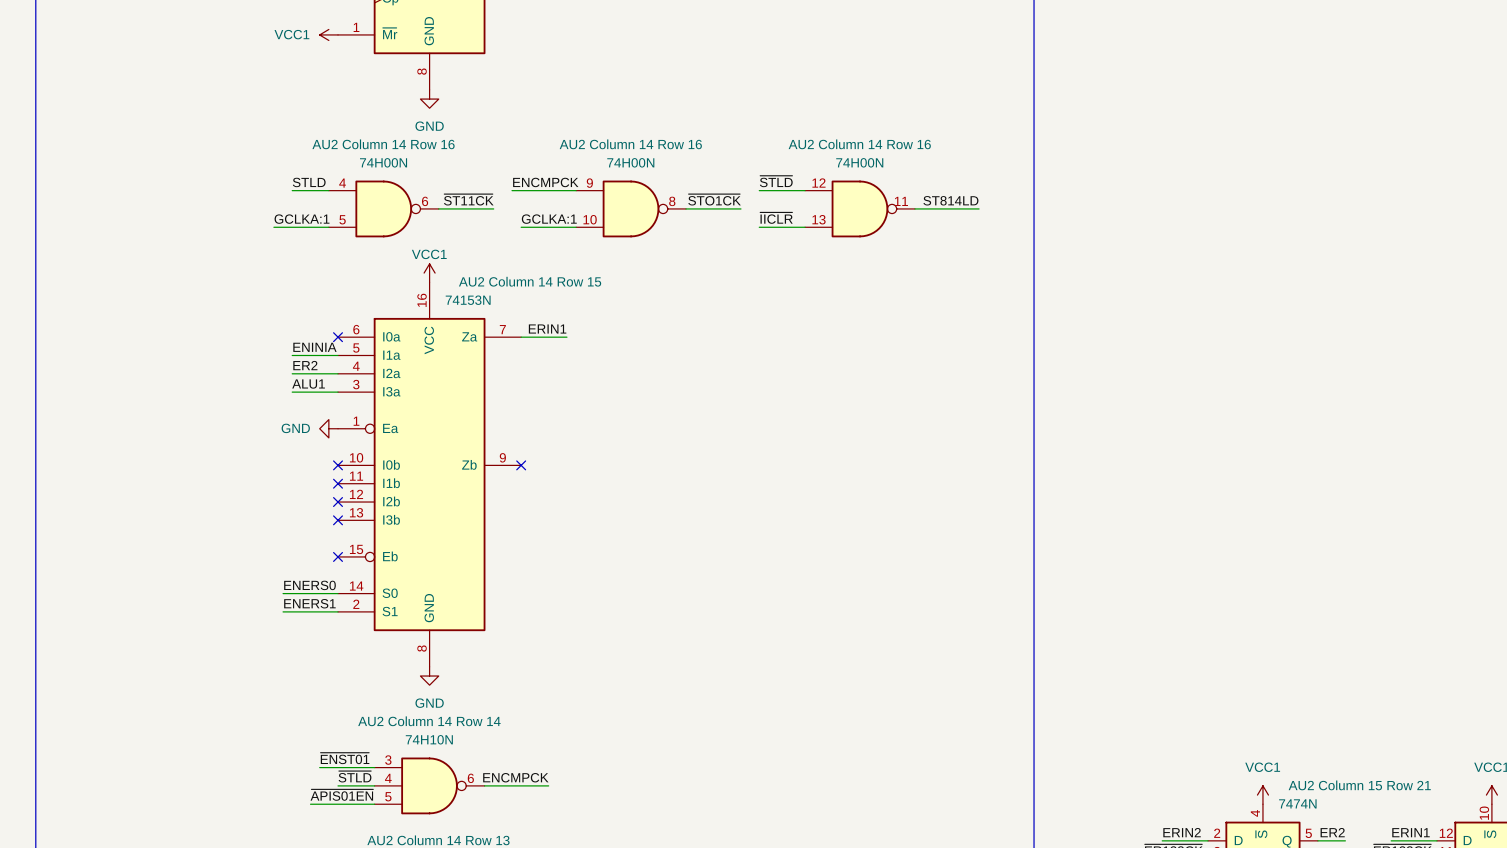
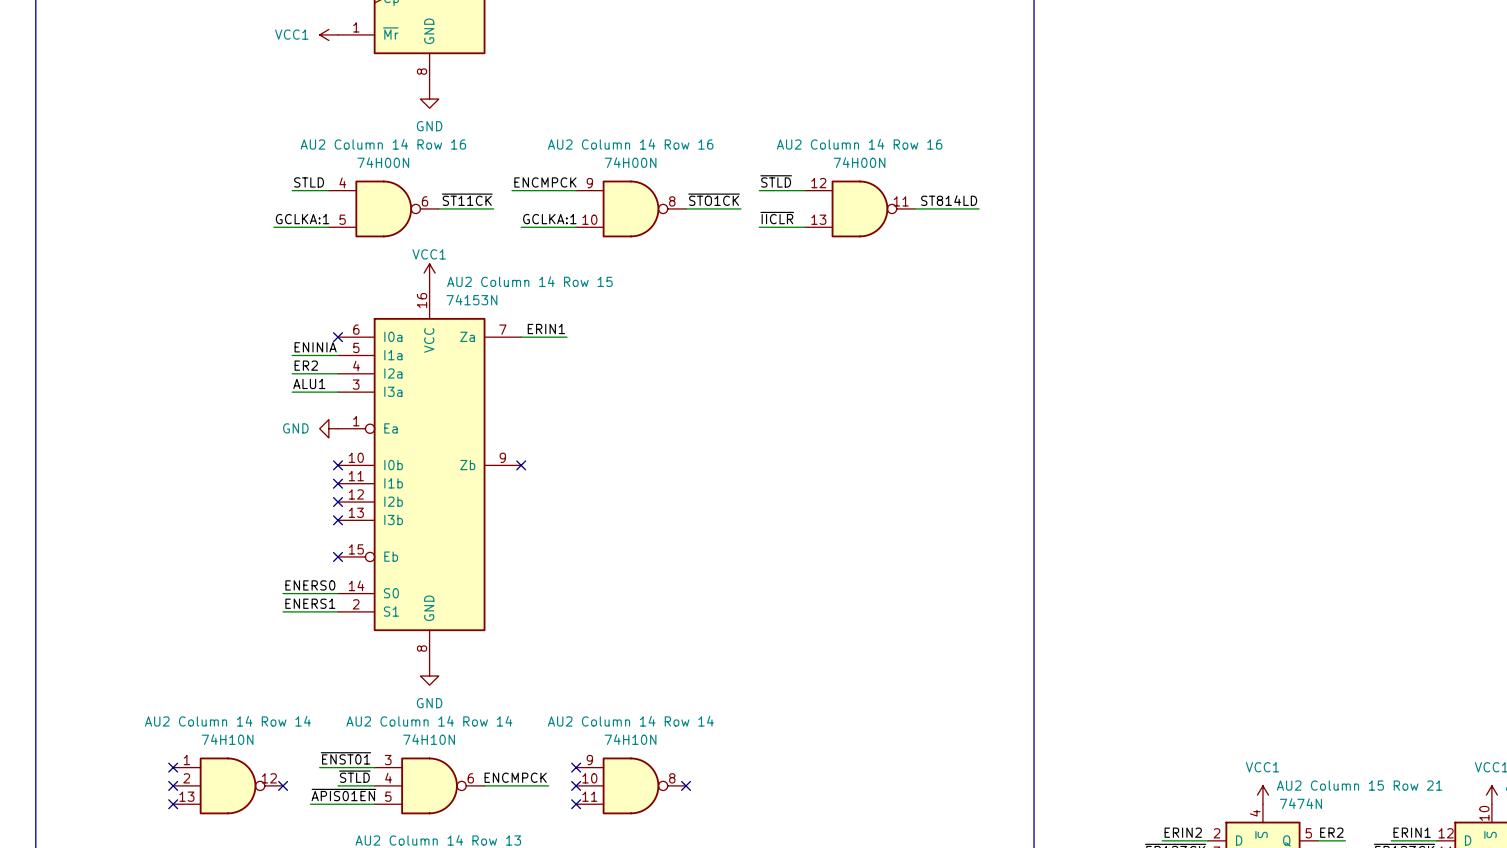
no-connect mark: none -> (173, 767)
no-connect mark: none -> (576, 767)
no-connect mark: none -> (173, 785)
part: none -> 74H10N (228, 785)
no-connect mark: none -> (283, 785)
no-connect mark: none -> (576, 785)
part: none -> 74H10N (631, 785)
no-connect mark: none -> (686, 785)
no-connect mark: none -> (173, 804)
no-connect mark: none -> (576, 804)

